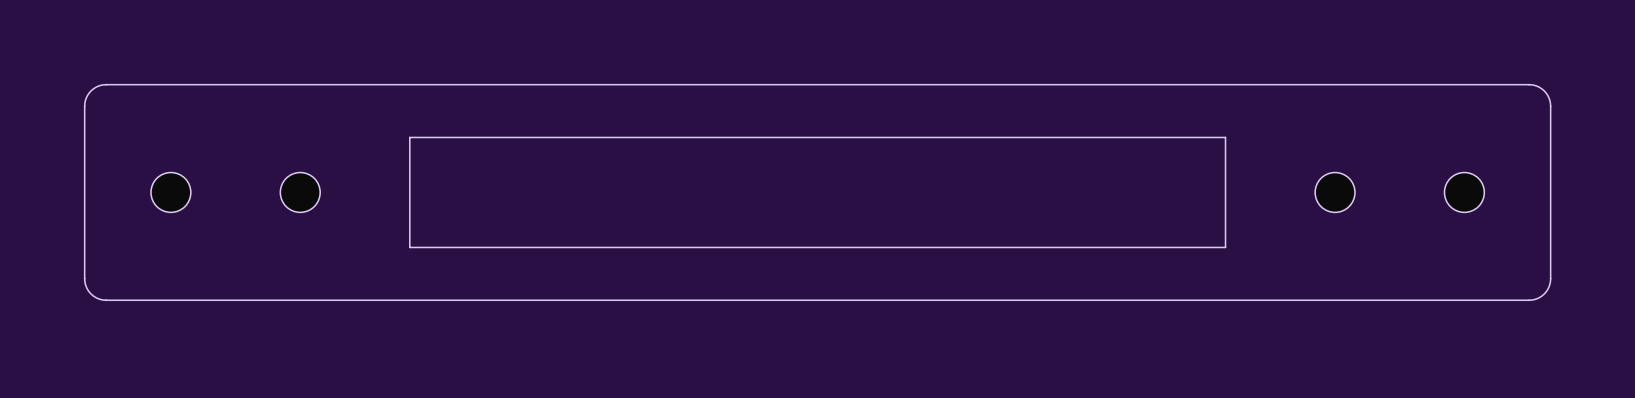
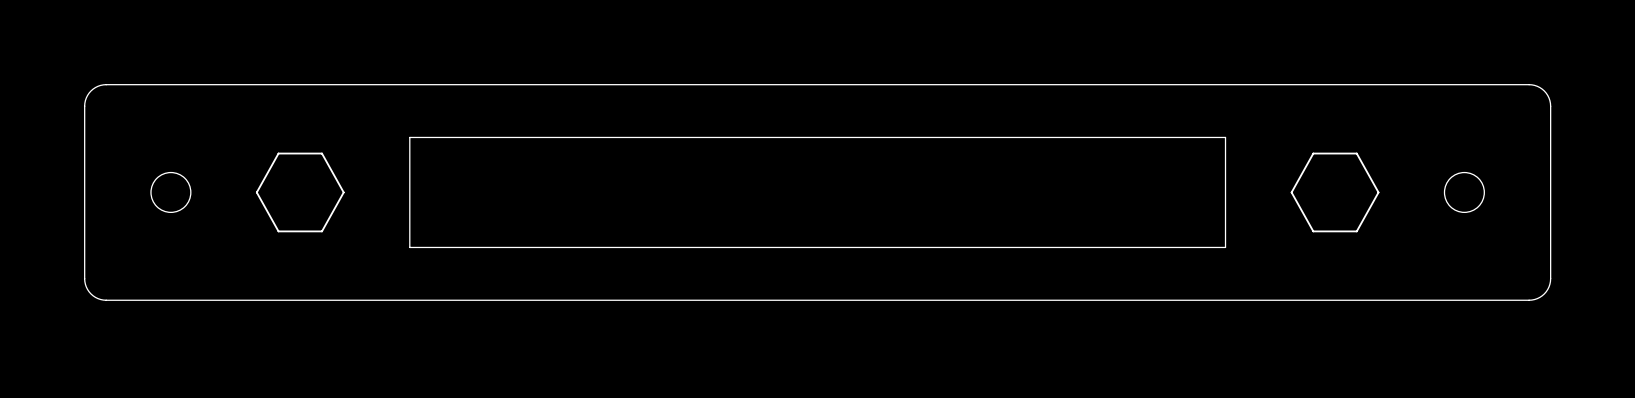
drawing: none -> [255, 152, 345, 233]
drawing: none -> [1290, 152, 1380, 233]
part: (300, 192) -> none
part: (1335, 192) -> none

